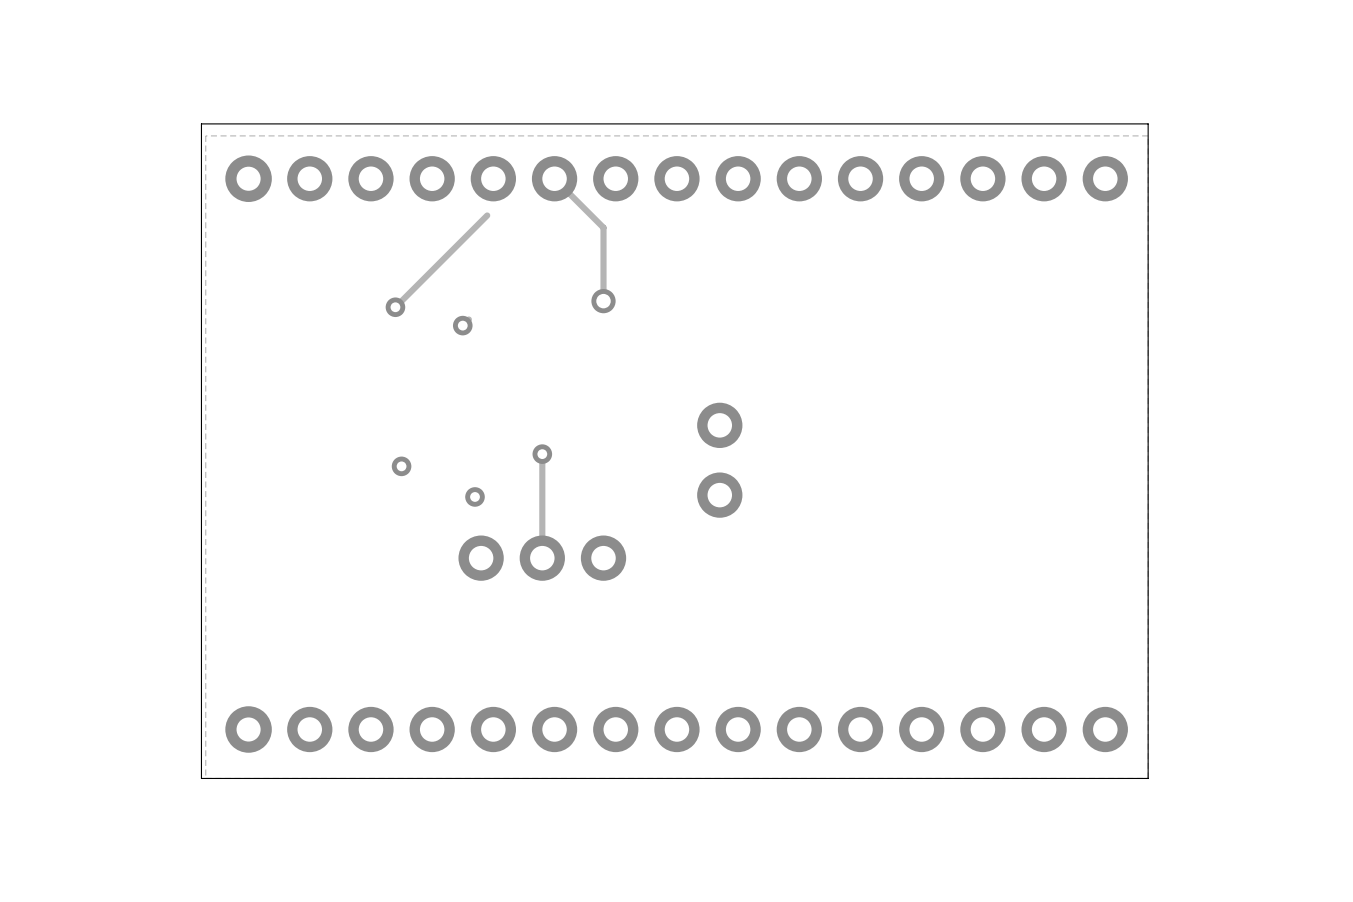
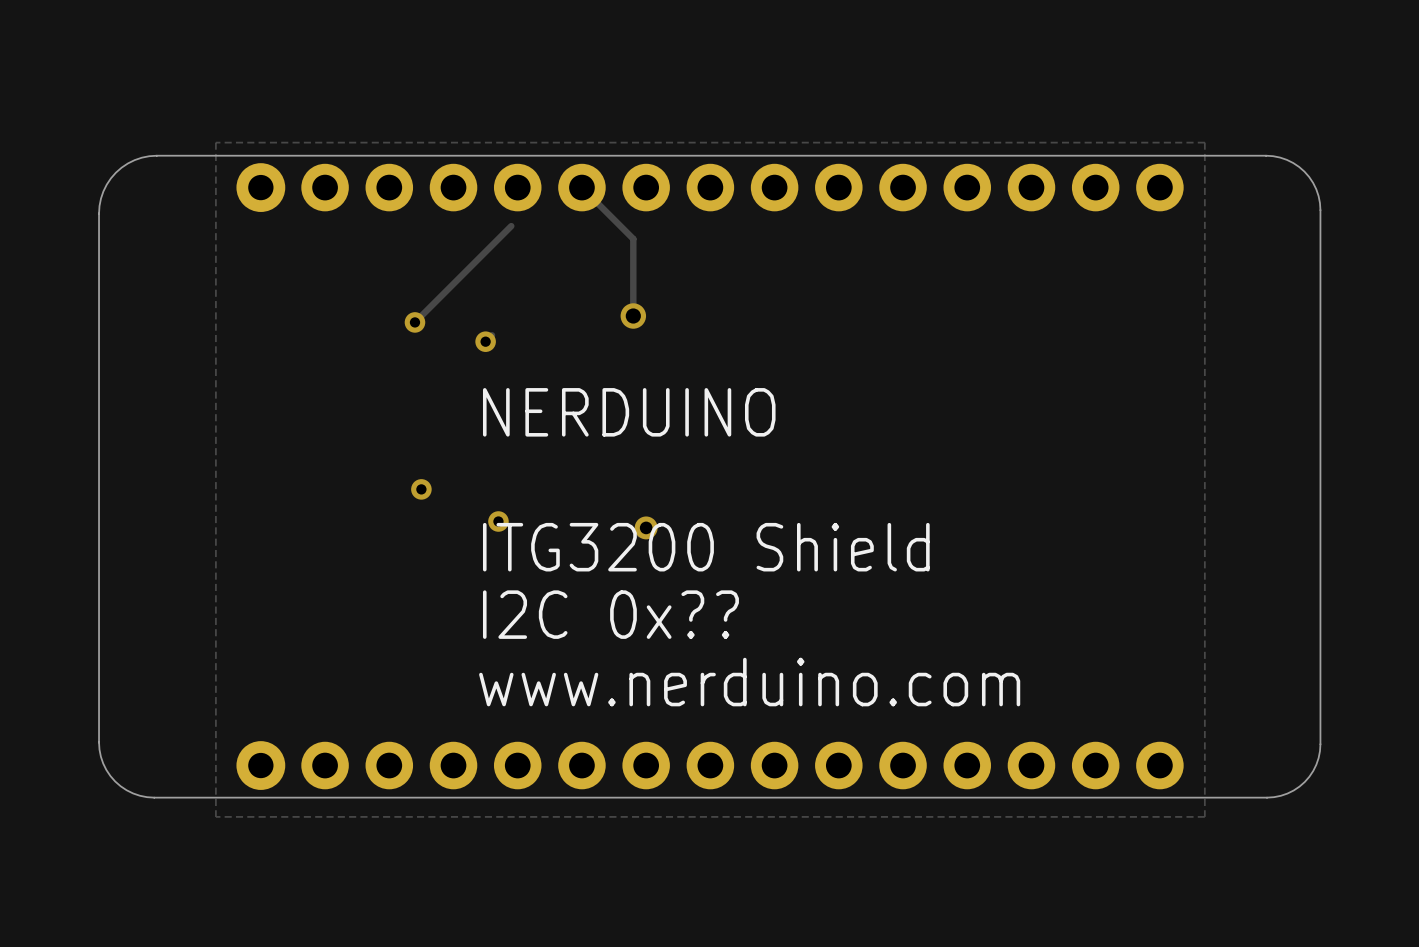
board edge: (1148, 123) (201, 123) (201, 778) (1148, 778) (1148, 123) -> (1266, 155) (1286, 159) (1304, 171) (1316, 189) (1320, 210) (1320, 744) (1318, 758) (1313, 770) (1304, 781) (1293, 790) (1280, 795) (1267, 797) (154, 797) (139, 795) (126, 790) (115, 781) (106, 770) (100, 756) (99, 742) (99, 213) (100, 198) (106, 184) (115, 172) (127, 163) (141, 157) (156, 155) (1266, 155)
text: none -> NERDUINO (629, 412)
track: (542, 454) (542, 558) -> none
via: (542, 454) -> none
part: (719, 460) -> none
via: none -> (646, 527)
text: none -> ITG3200 Shield (706, 547)
part: (542, 558) -> none
text: none -> I2C 0x?? (610, 614)
text: none -> www.nerduino.com (749, 682)

